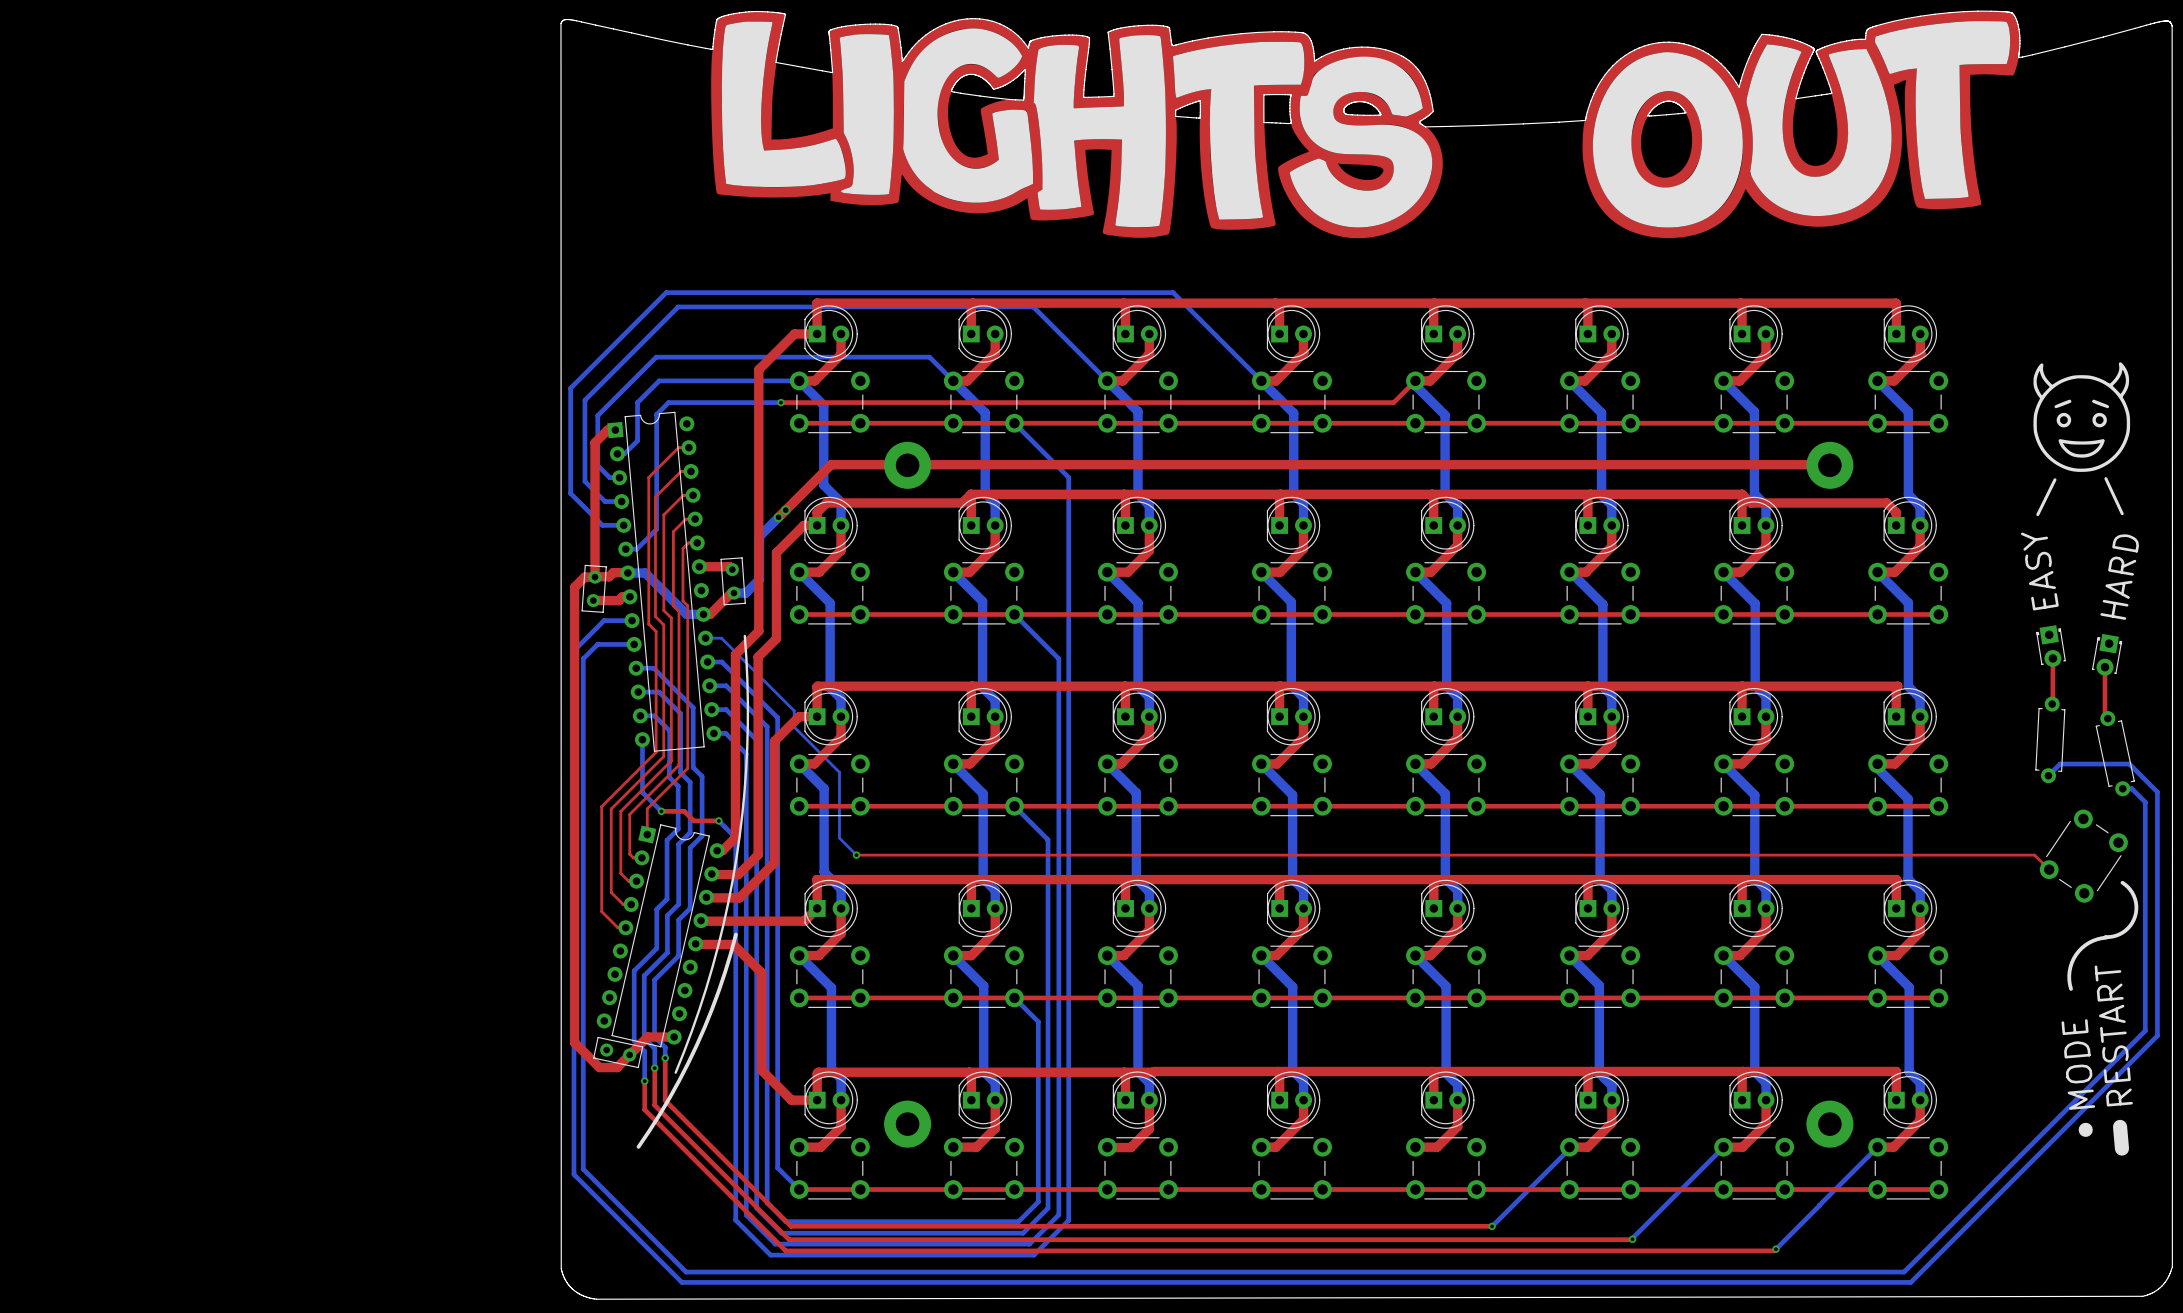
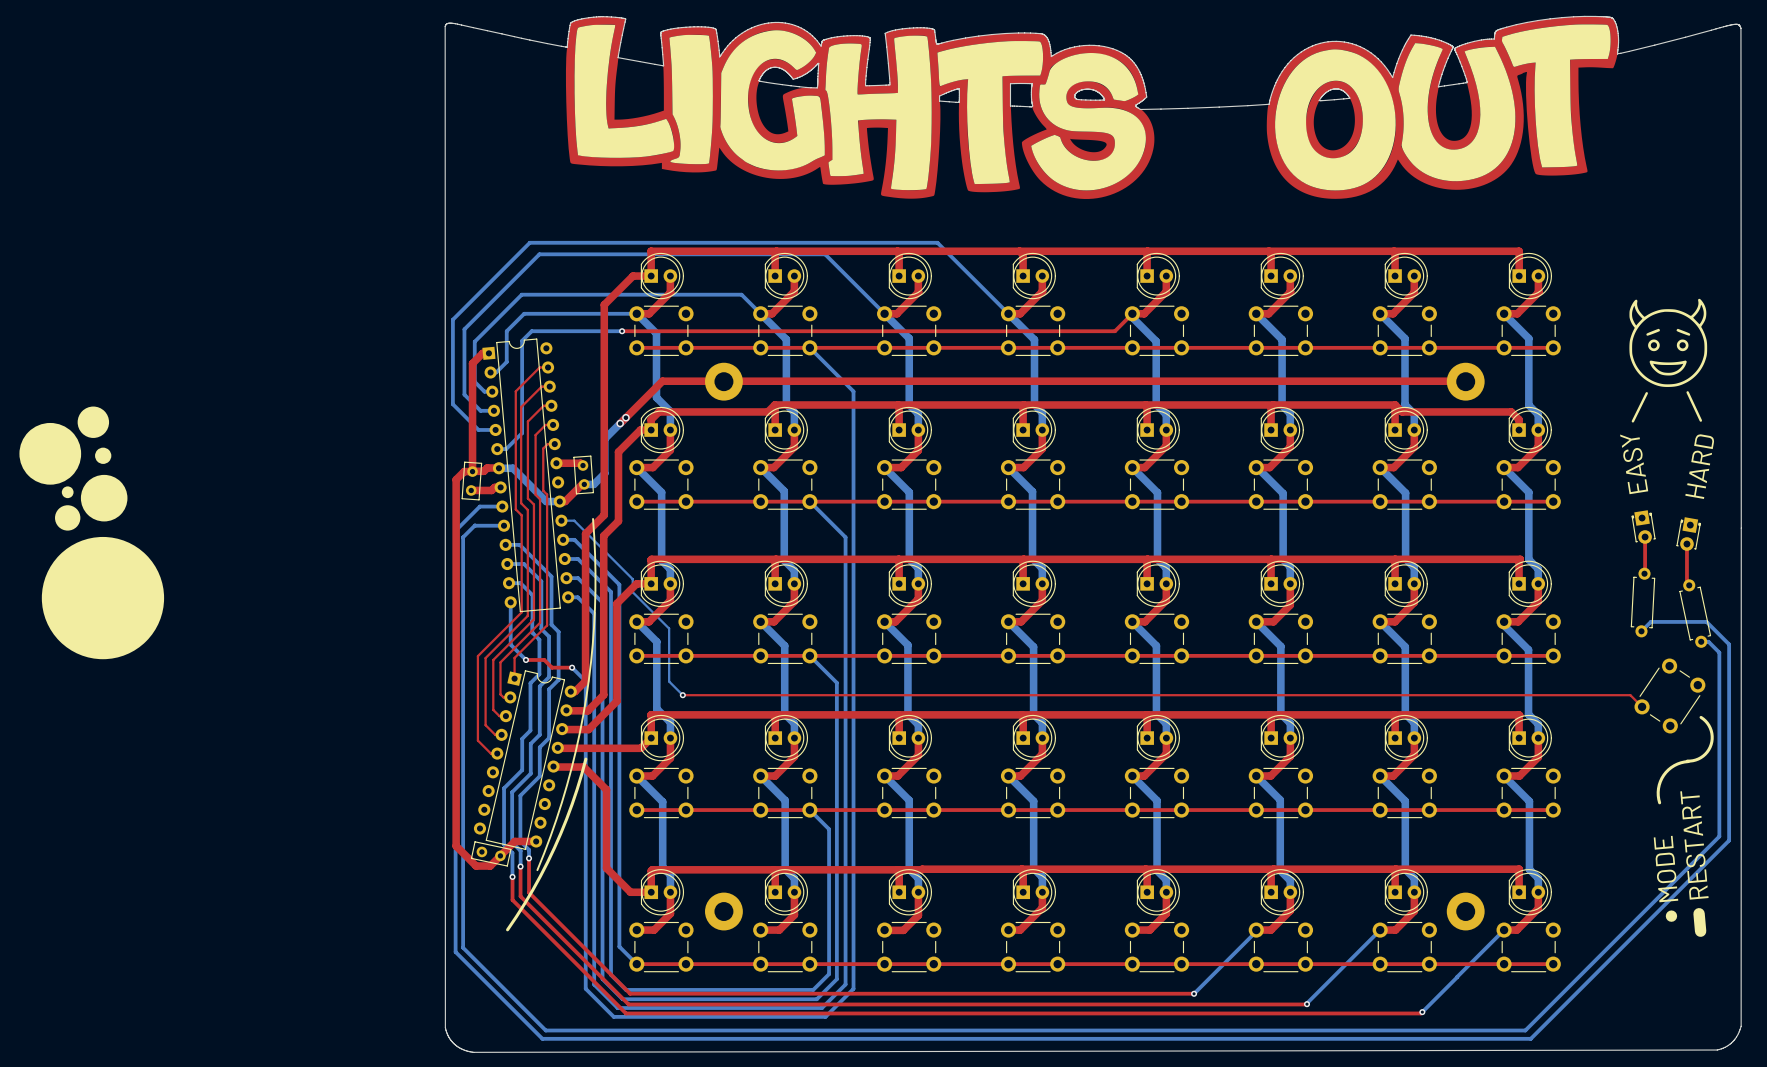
drawing: none -> [19, 406, 165, 660]
drawing: none -> [95, 447, 112, 464]

